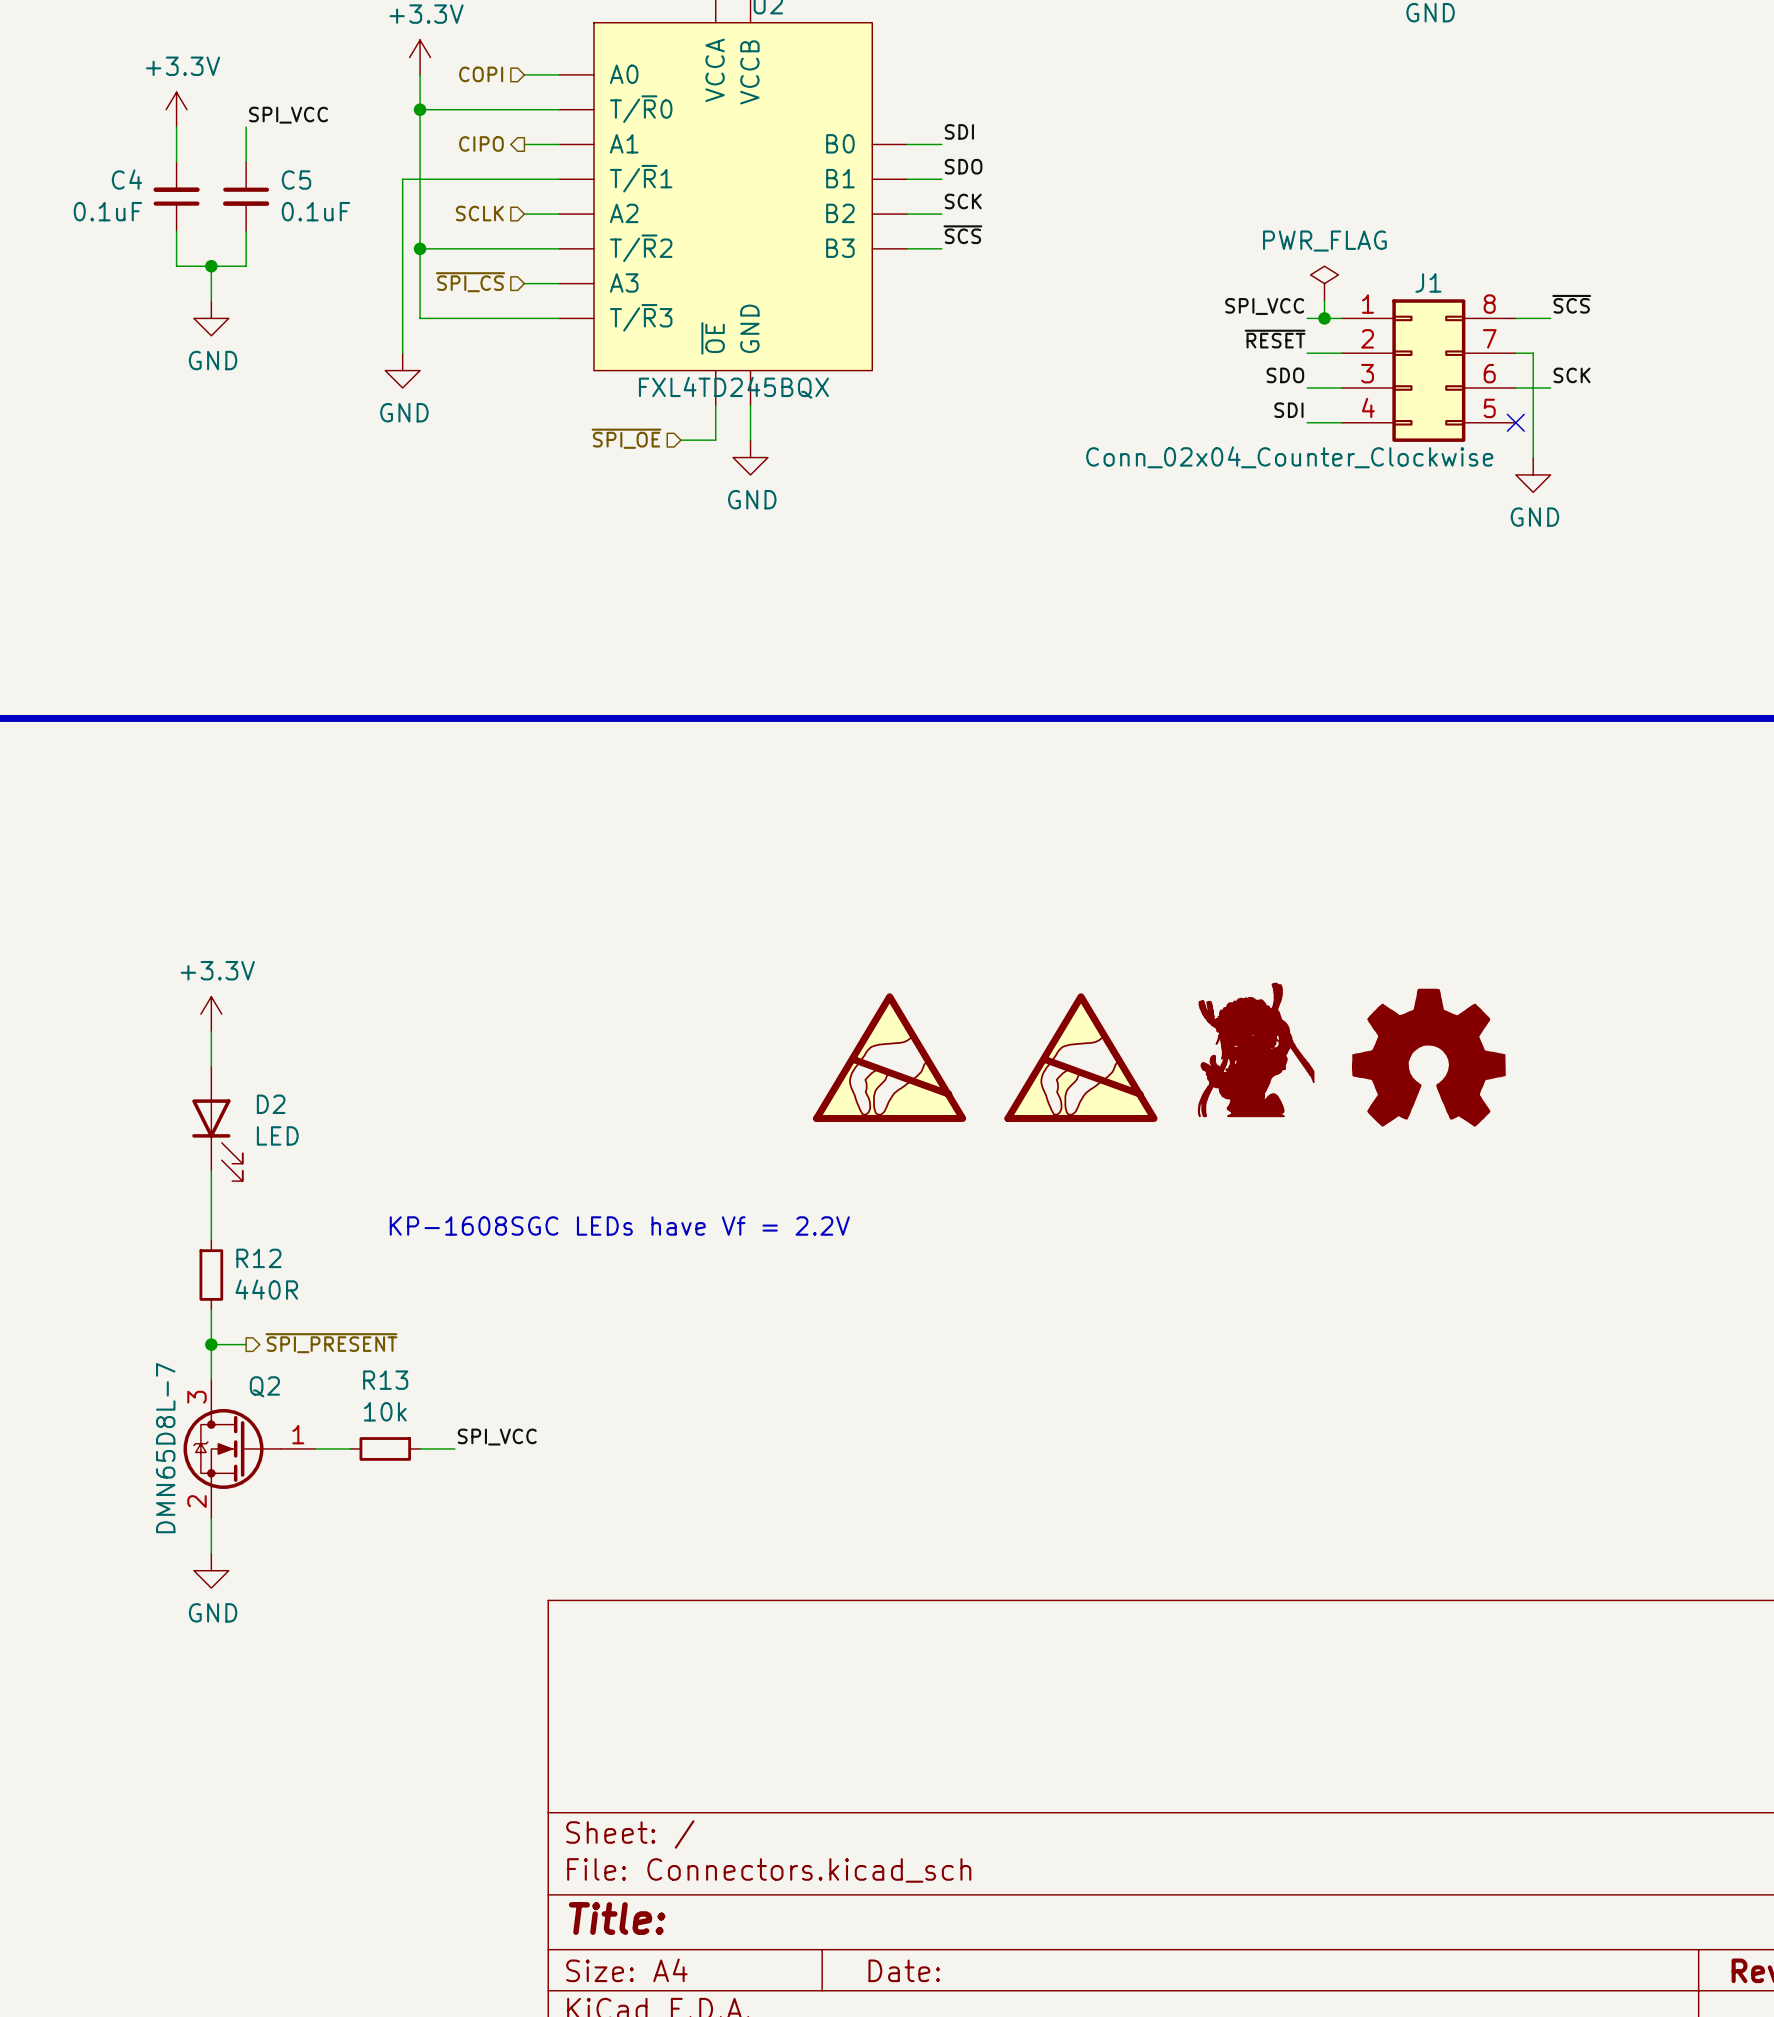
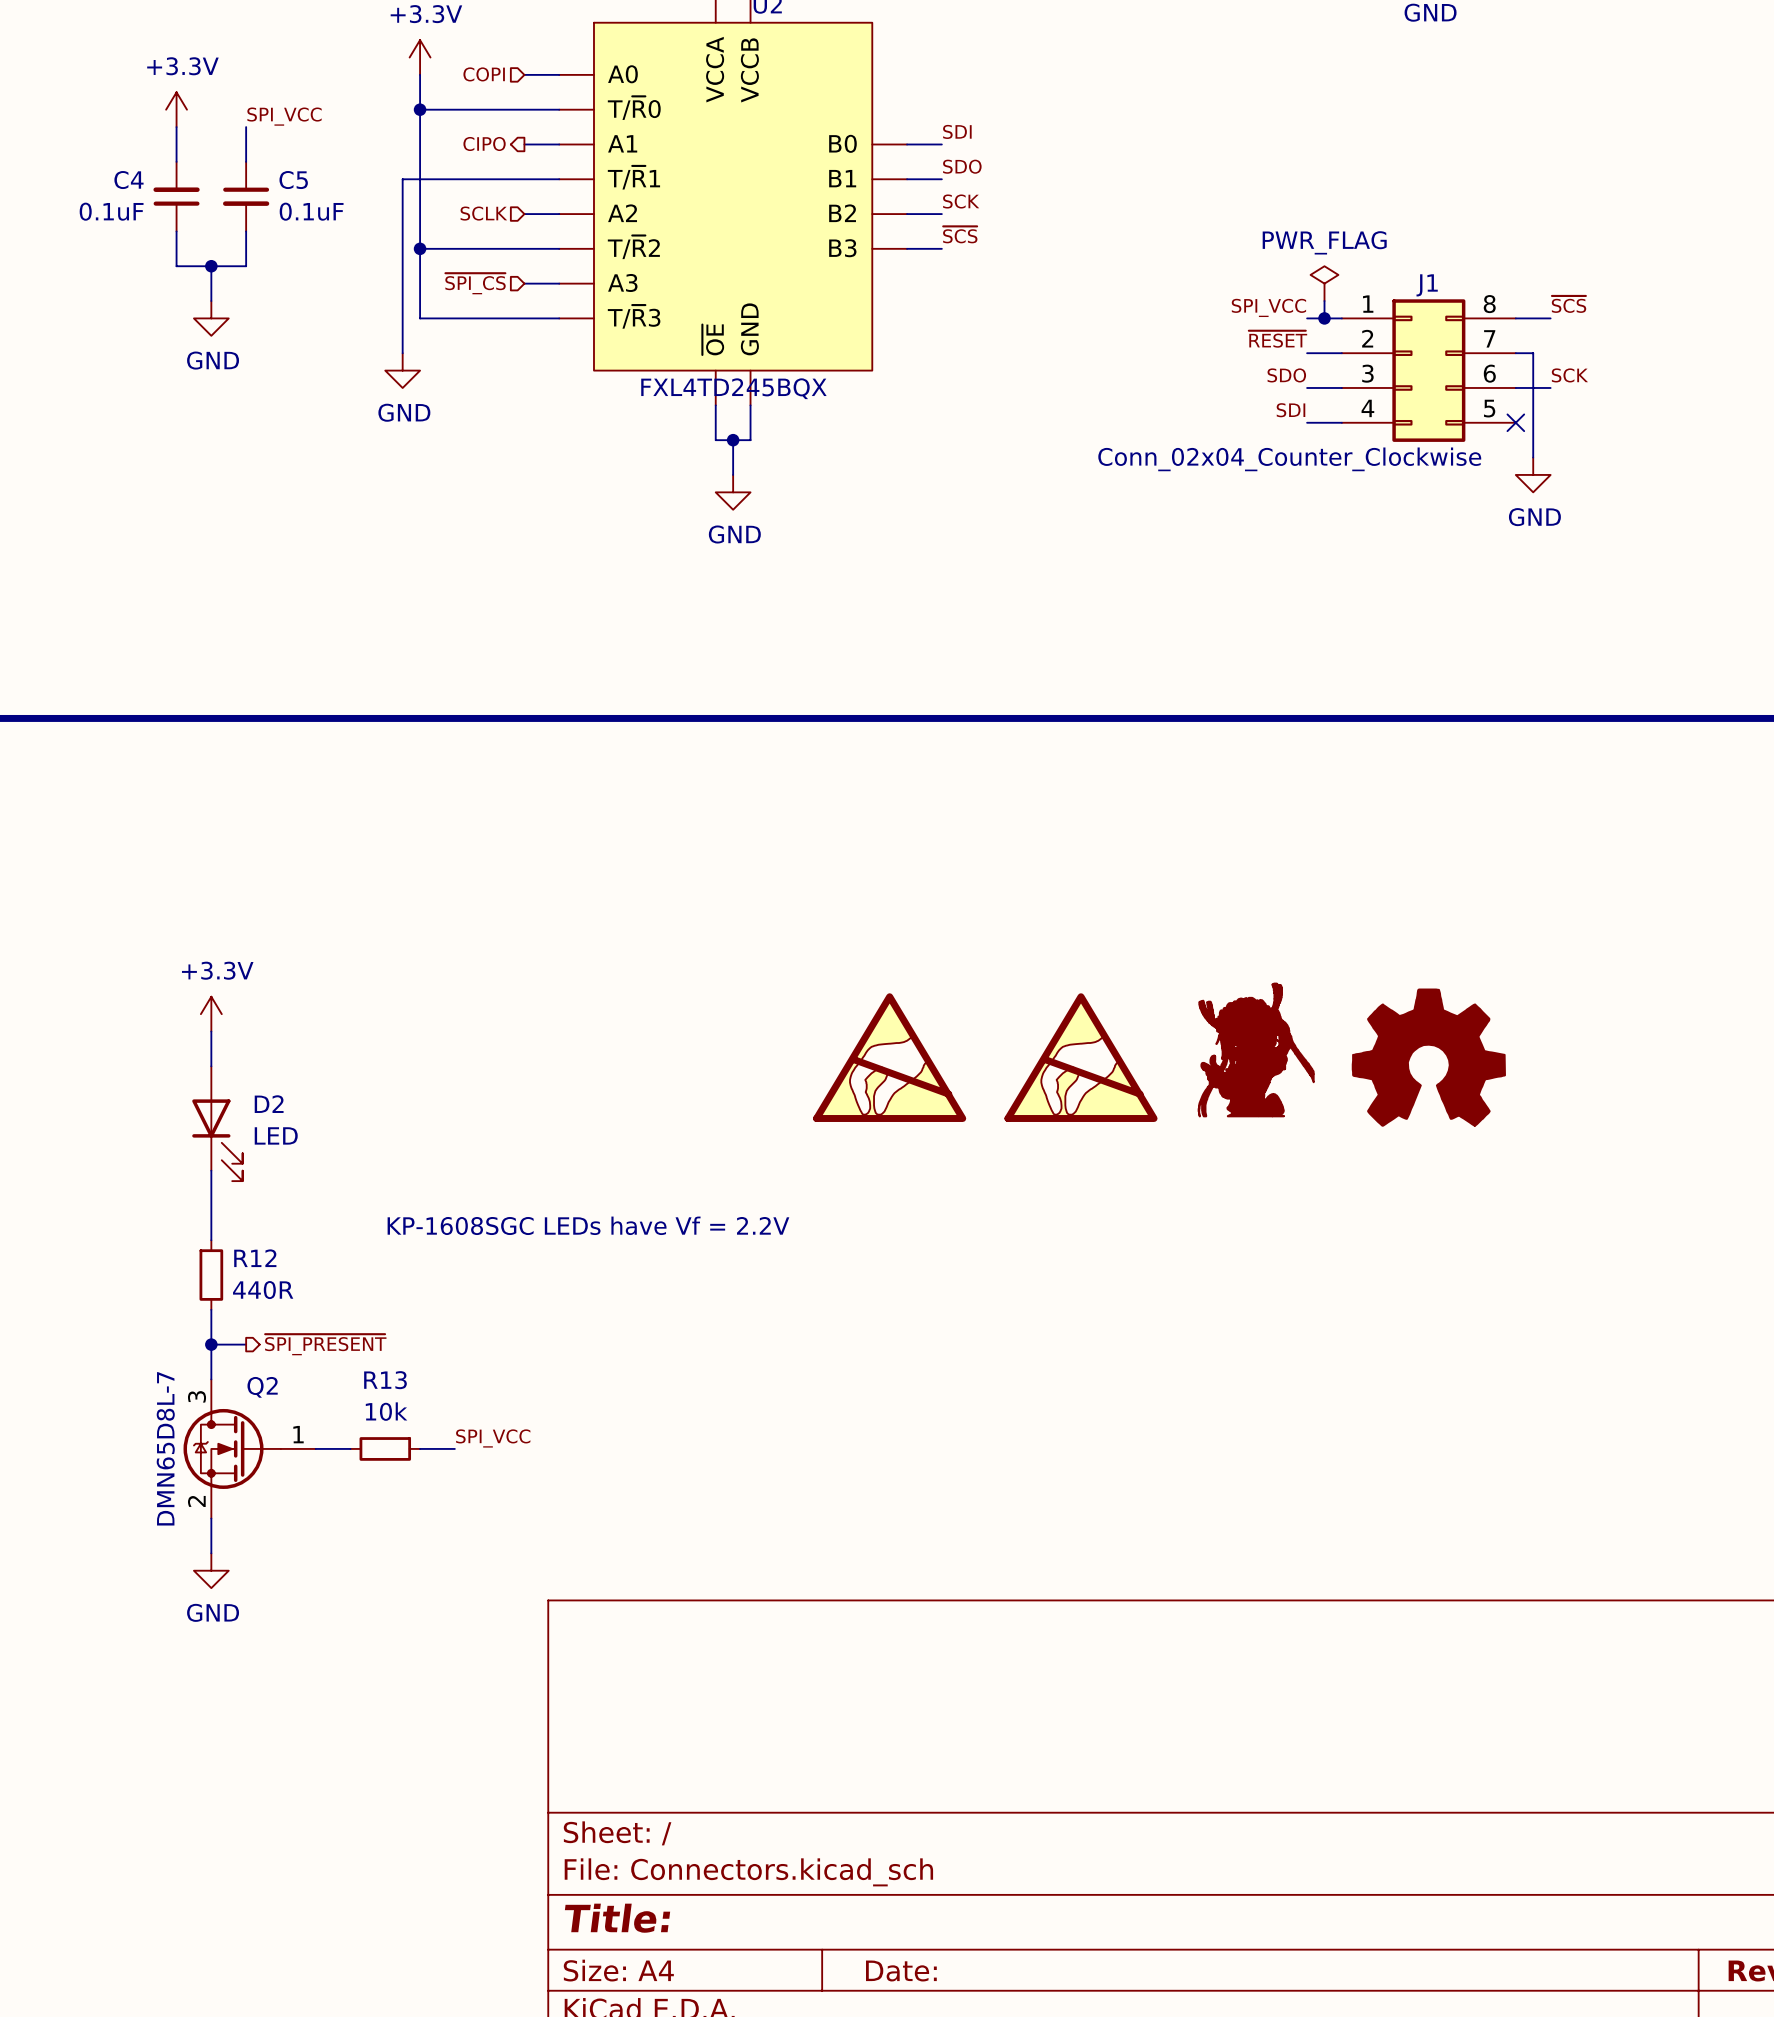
hierarchical label: ~{SPI_OE} (626, 438) -> none
wire: (680, 440) (715, 440) -> (750, 440) (715, 440)
wire: none -> (733, 440) (733, 474)
junction: none -> (733, 440)
power symbol position: GND (750, 457) -> GND (733, 492)

